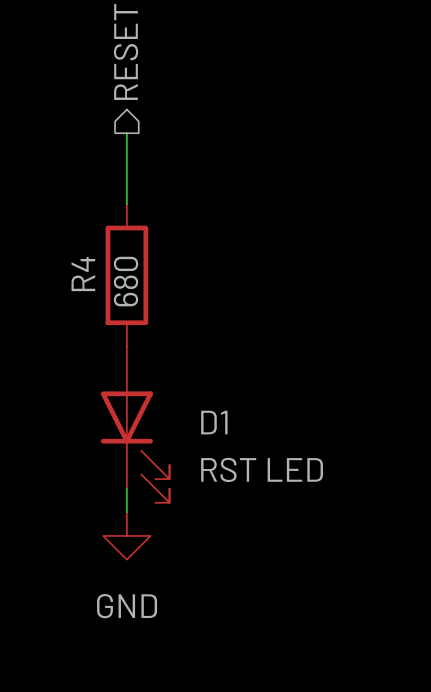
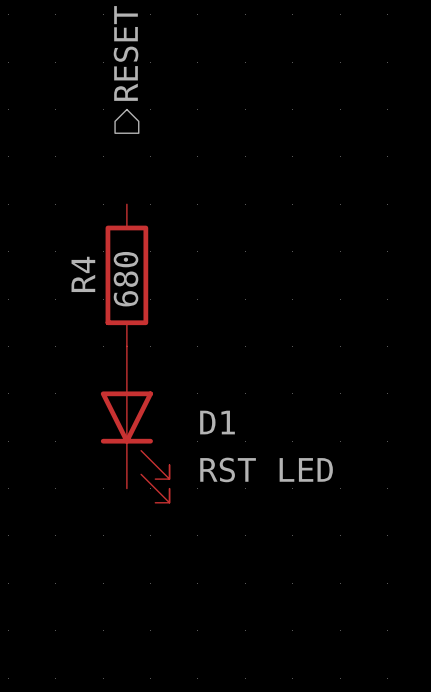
wire: (126, 133) (126, 204) -> none
wire: (126, 488) (126, 512) -> none
power symbol: GND (126, 535) -> none

